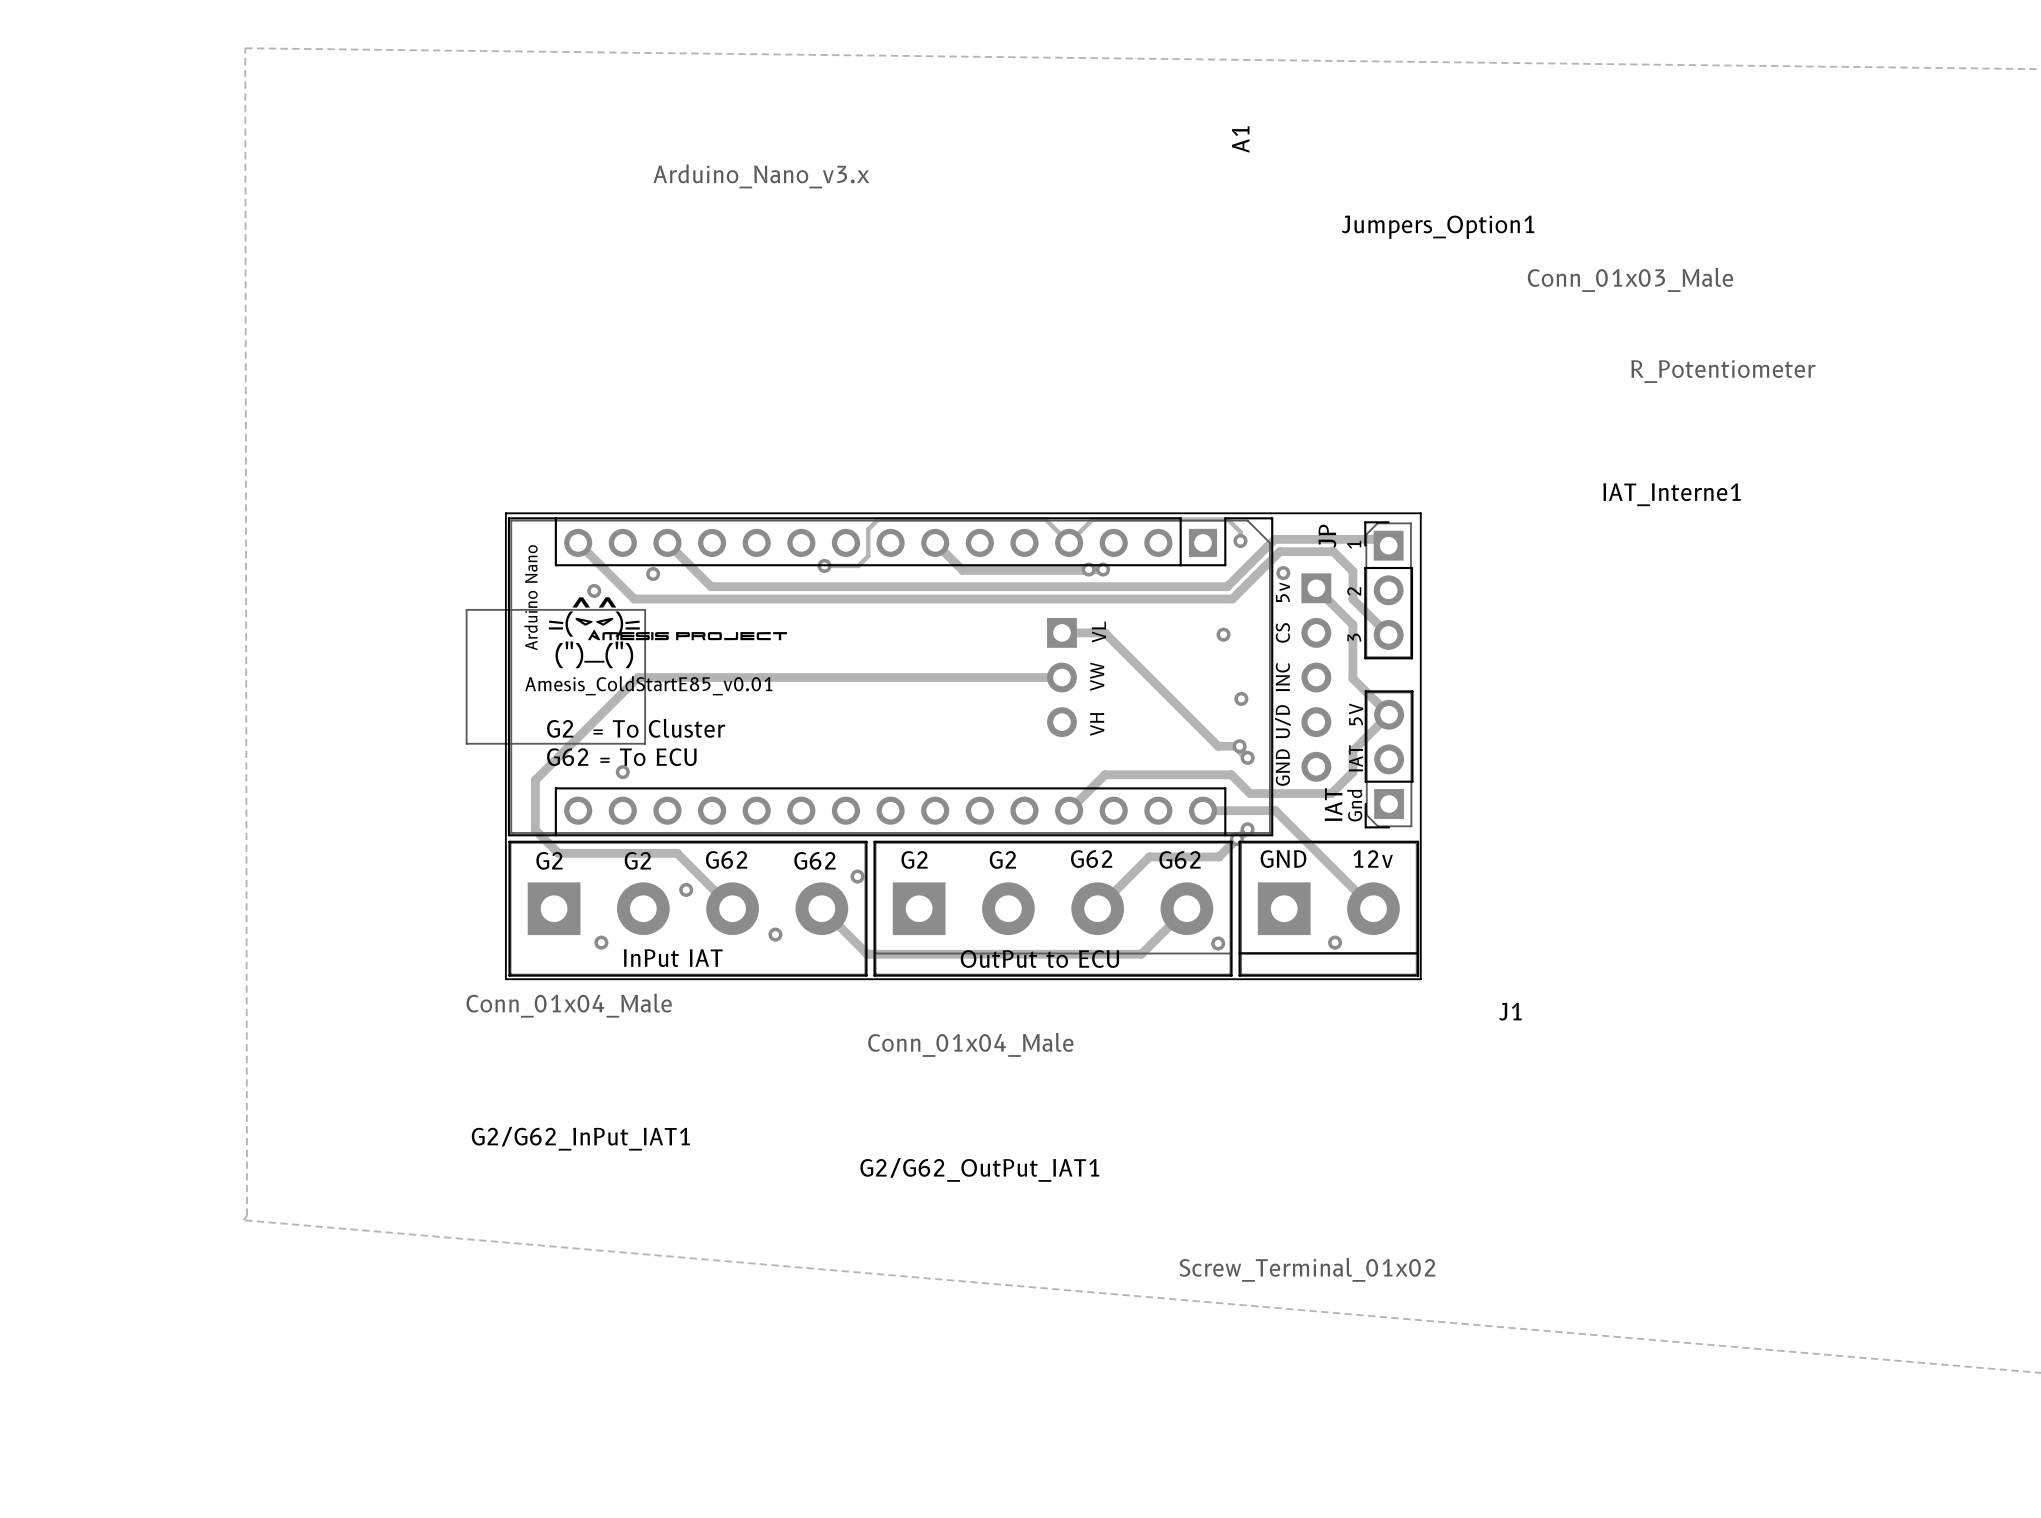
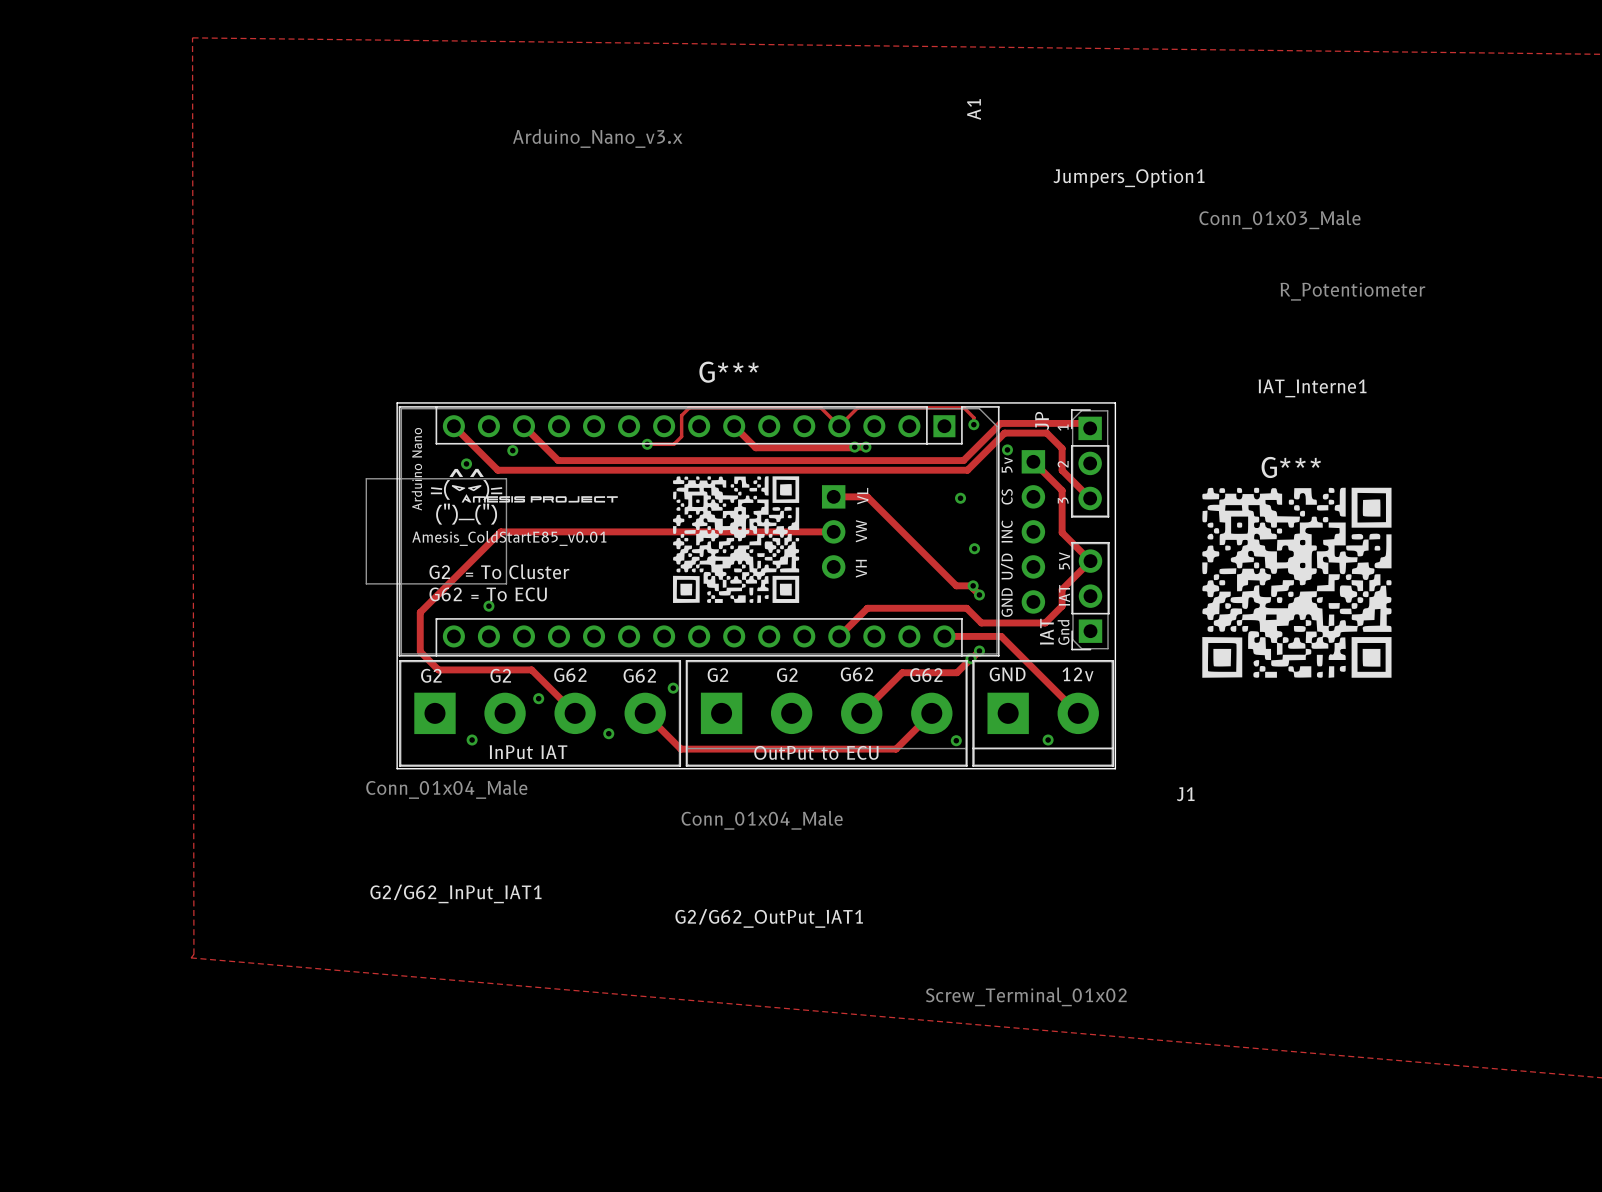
G***: none -> (736, 539)
G***: none -> (1296, 582)

